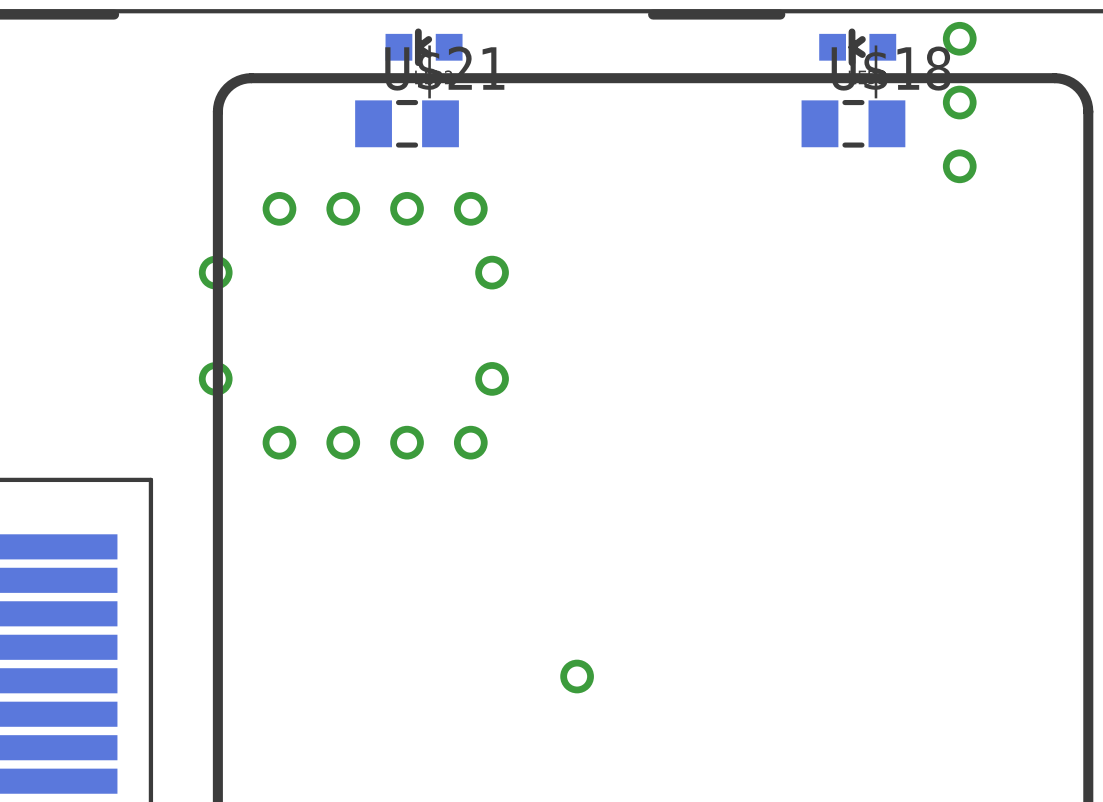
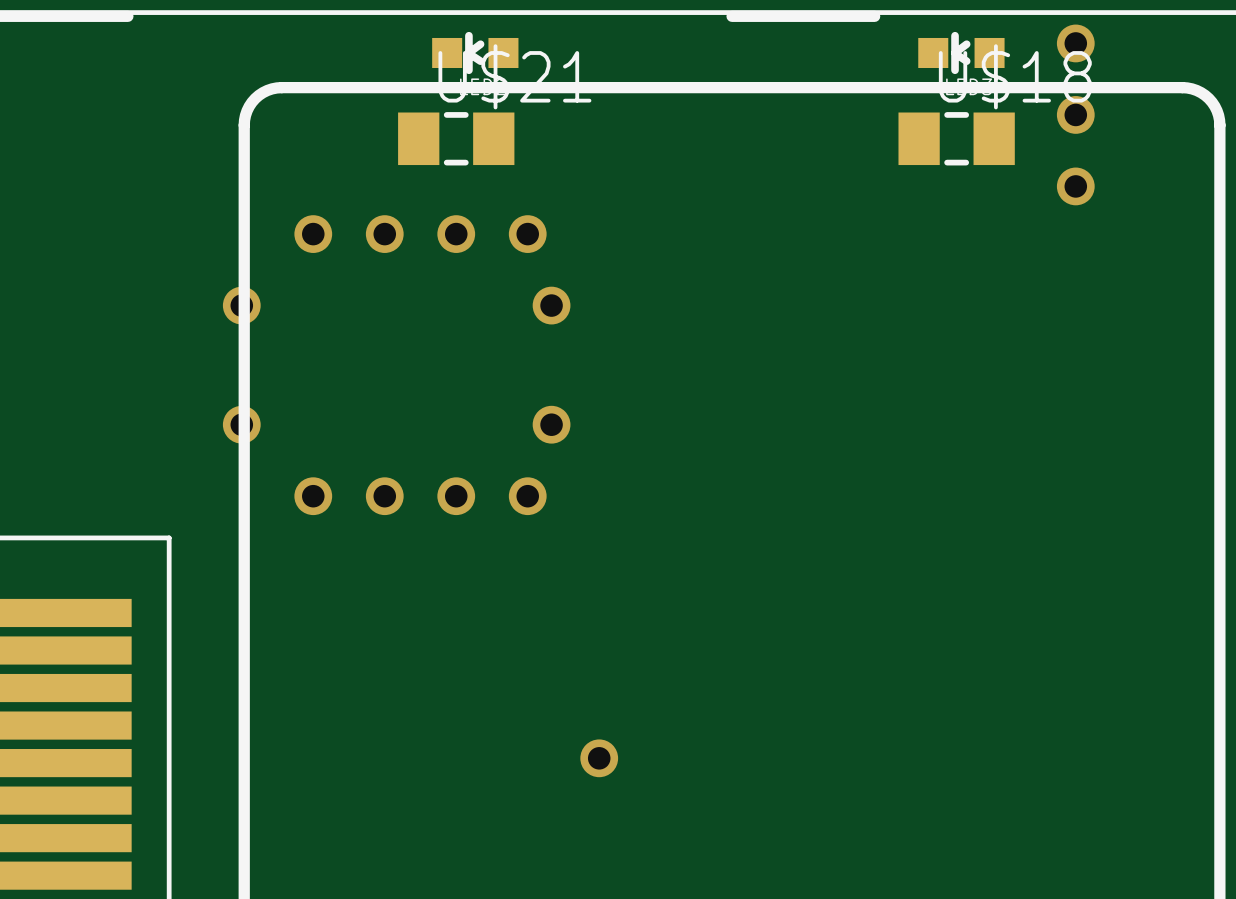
via position: (577, 676) -> (599, 758)

